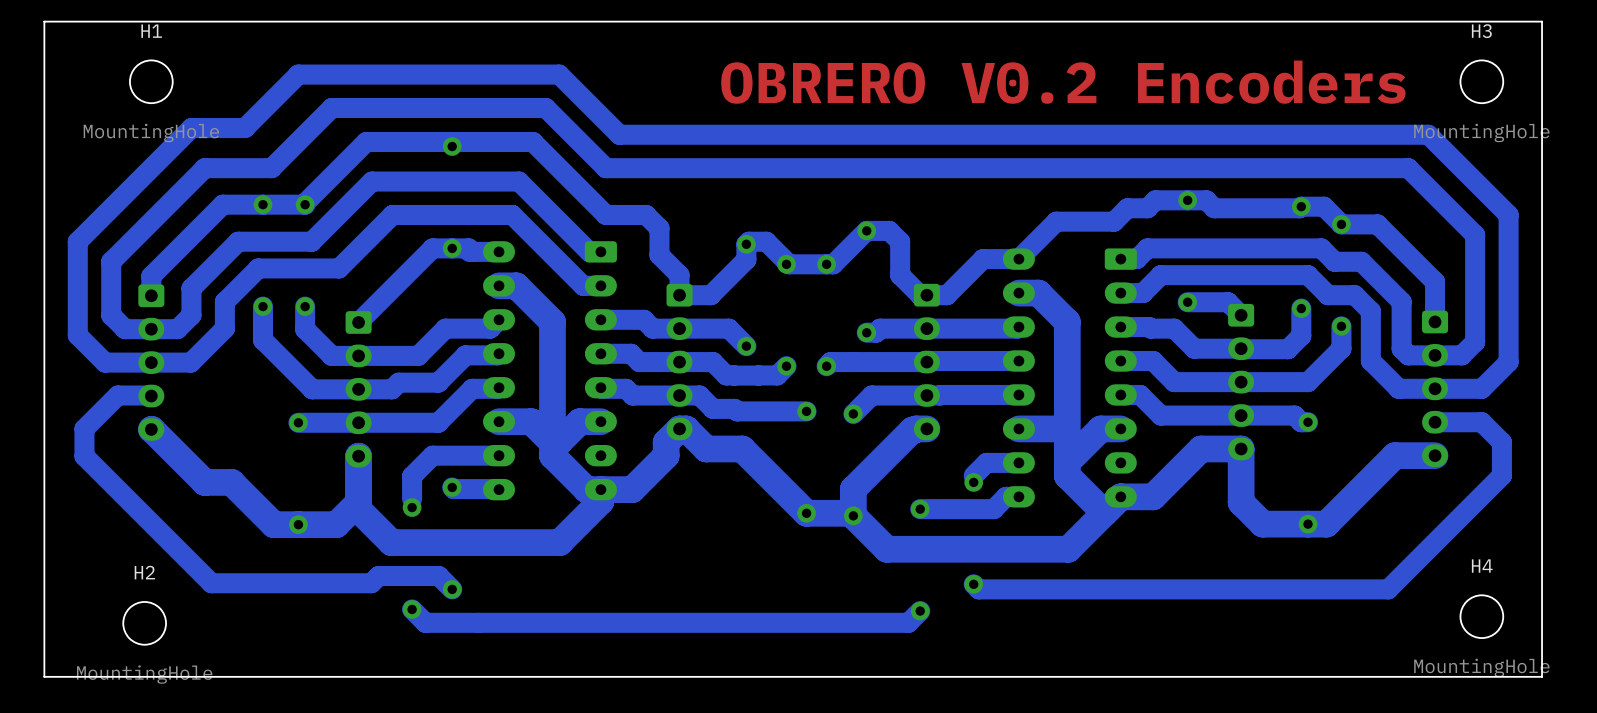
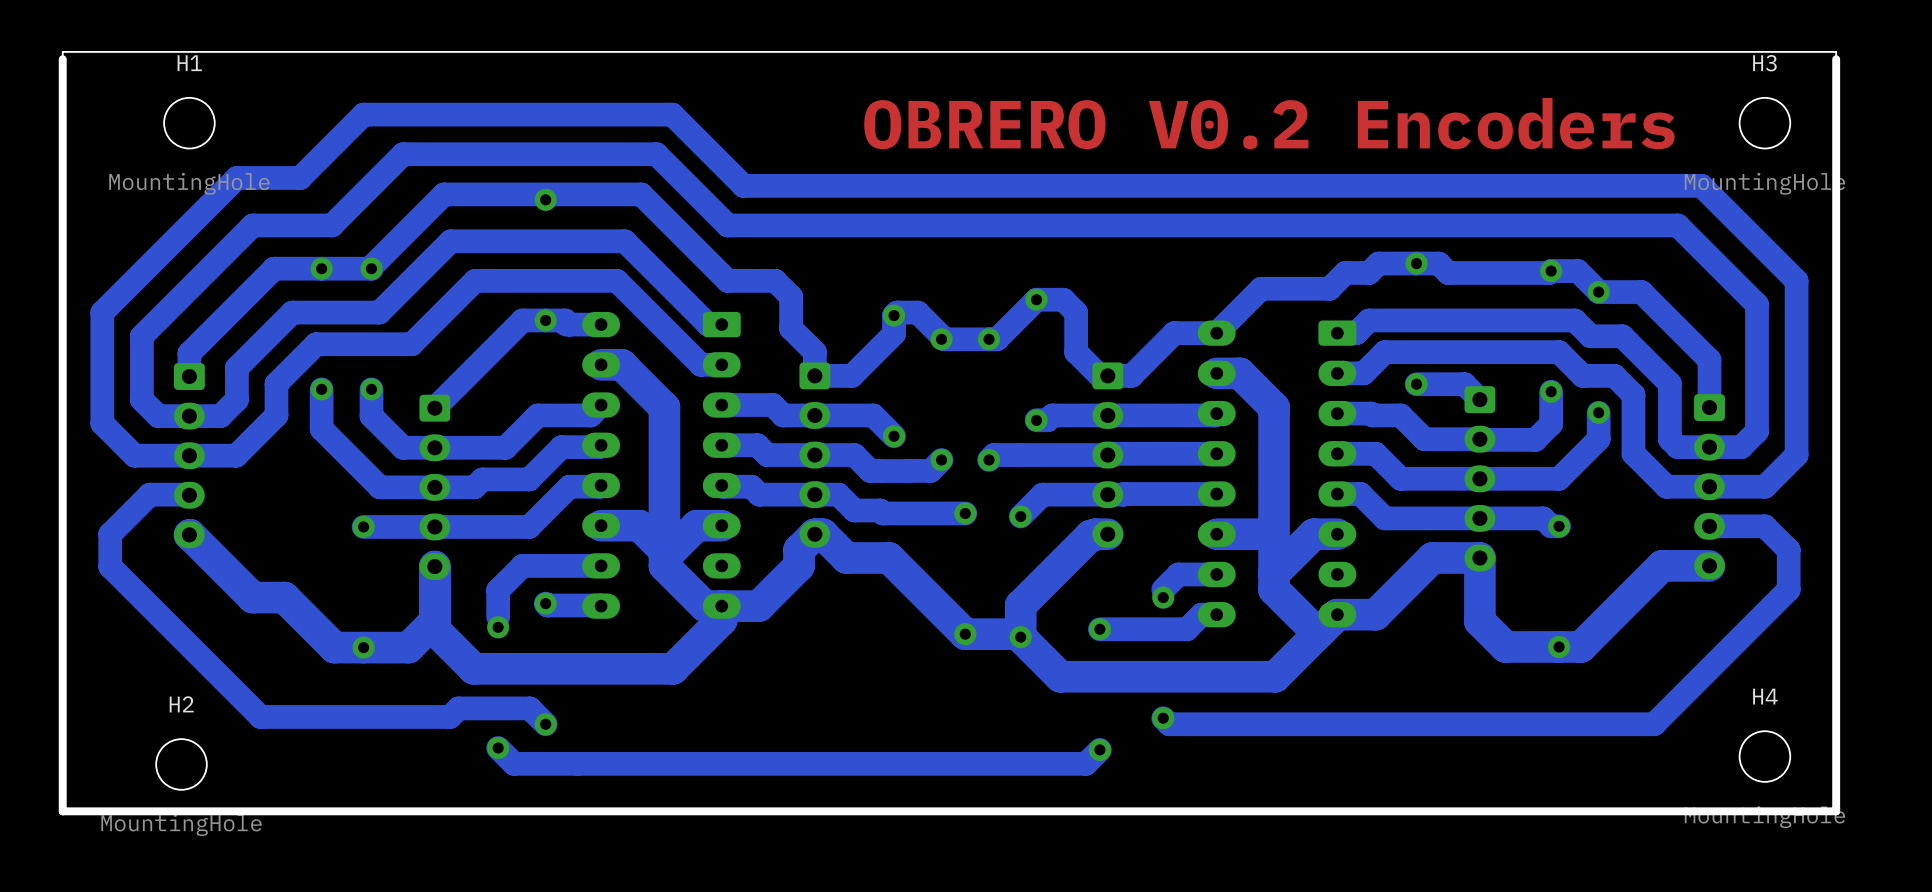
board edge width: thin (44, 27) (44, 662) -> thick (62, 59) (62, 811)
board edge width: thin (1542, 27) (1542, 662) -> thick (1836, 59) (1836, 811)
board edge: (44, 662) (44, 676) (1542, 676) (1542, 662) -> (62, 811) (1836, 811)

